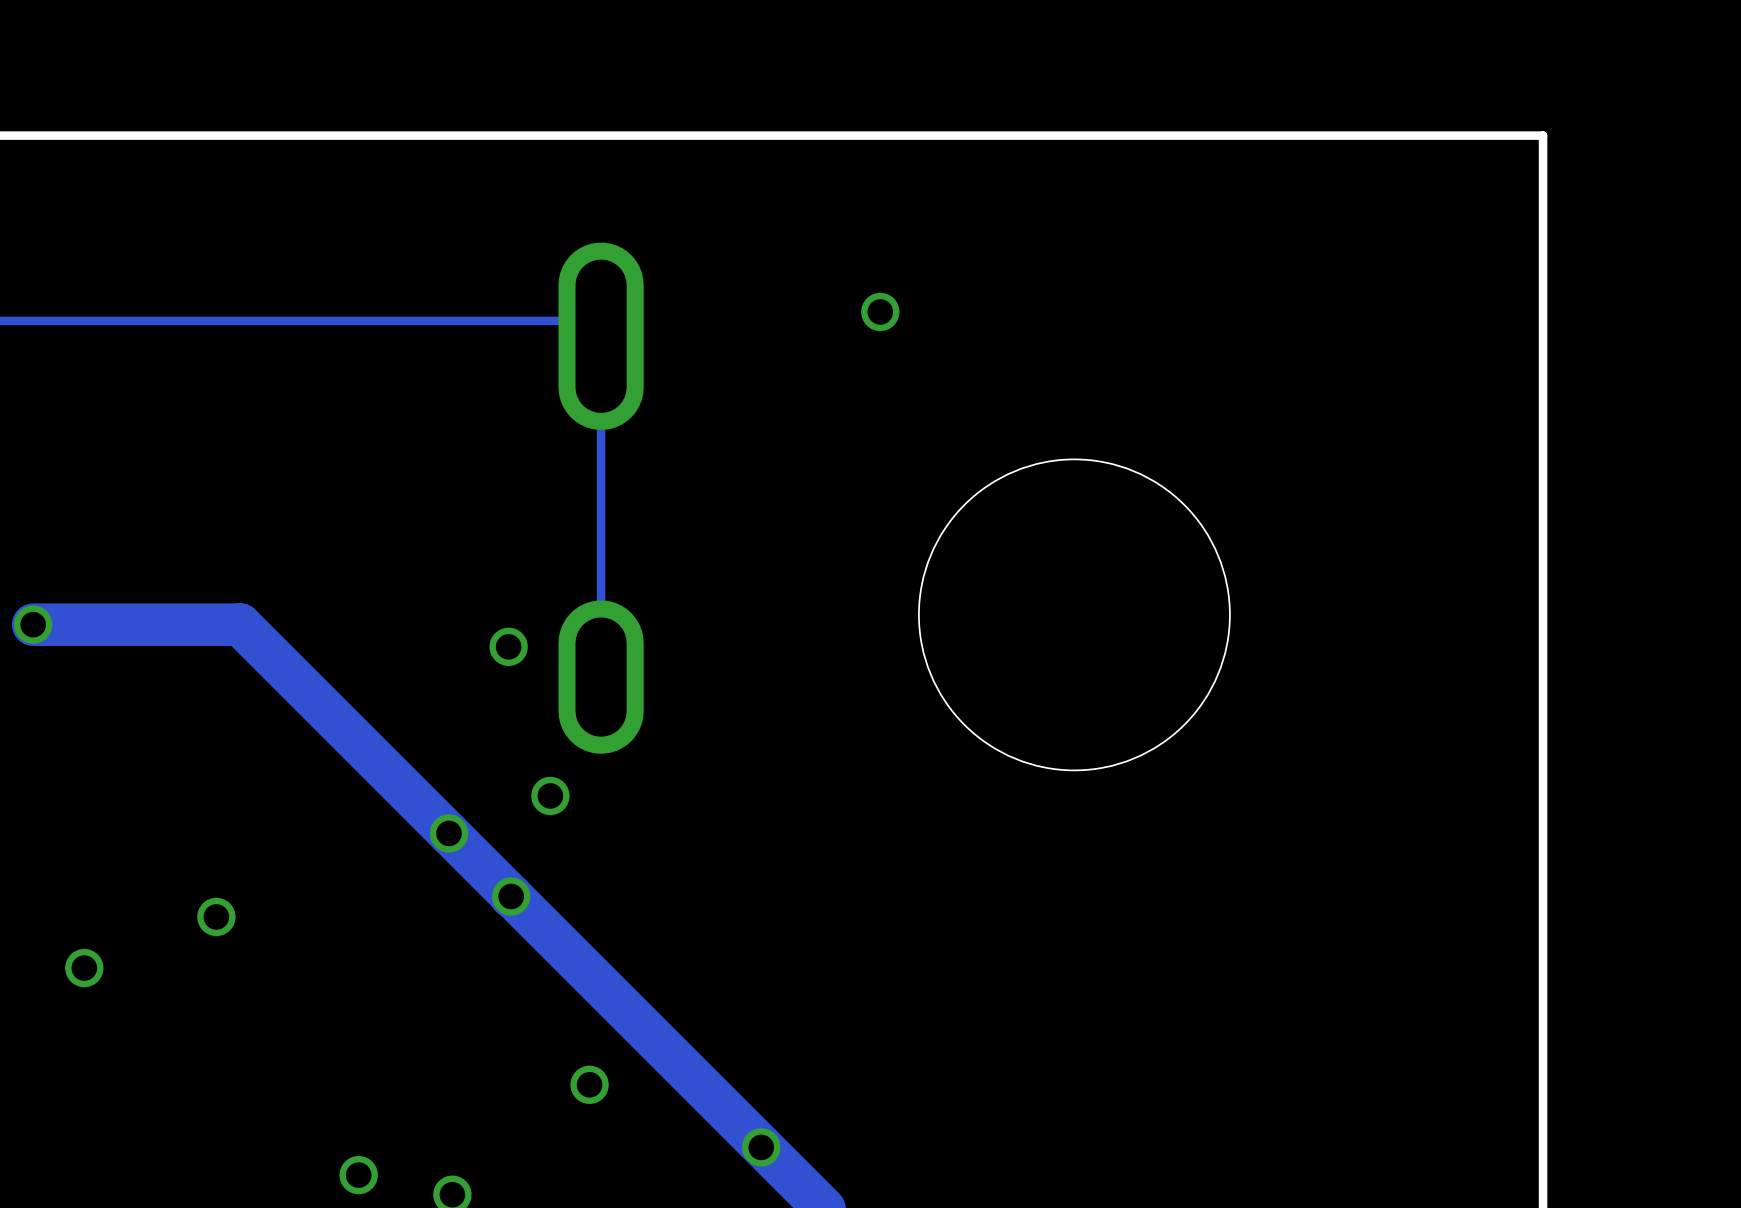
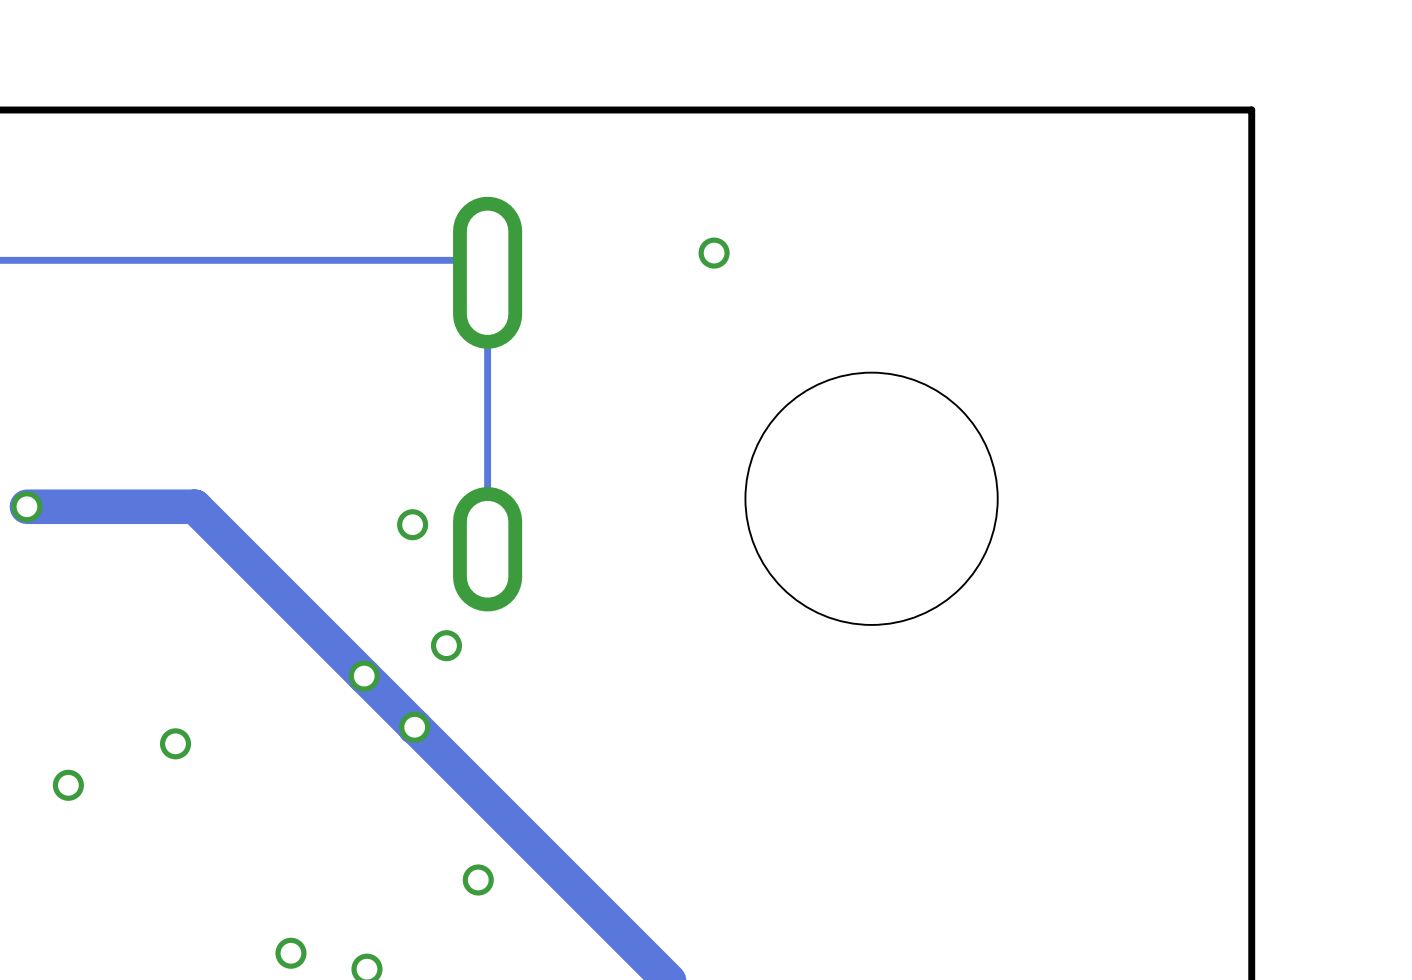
via: (761, 1147) -> none

